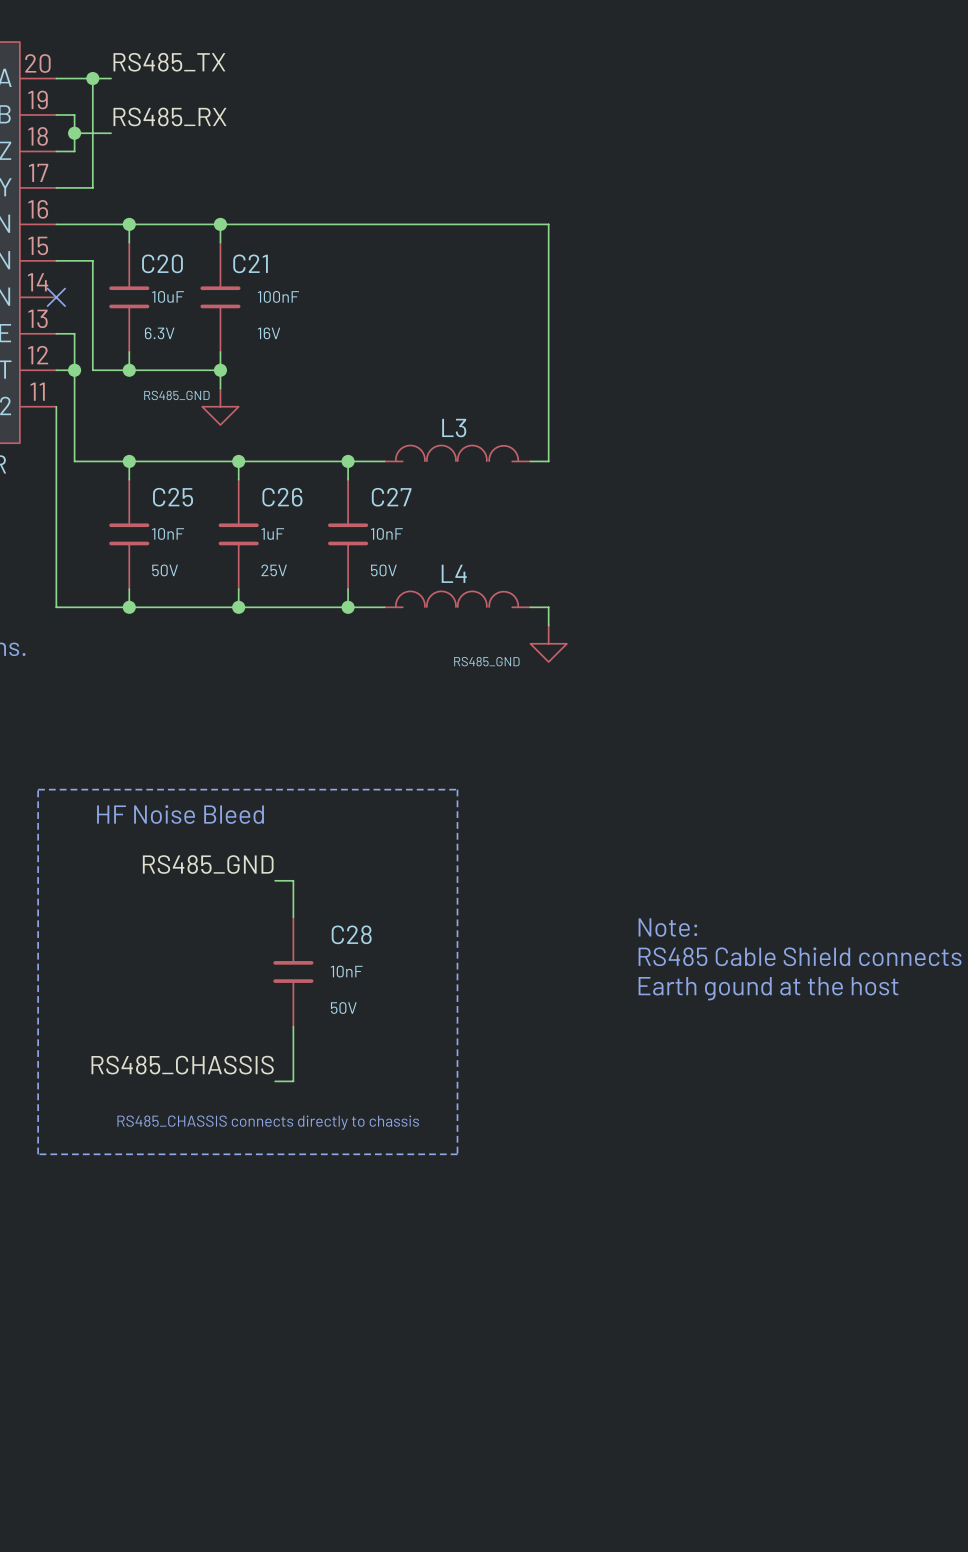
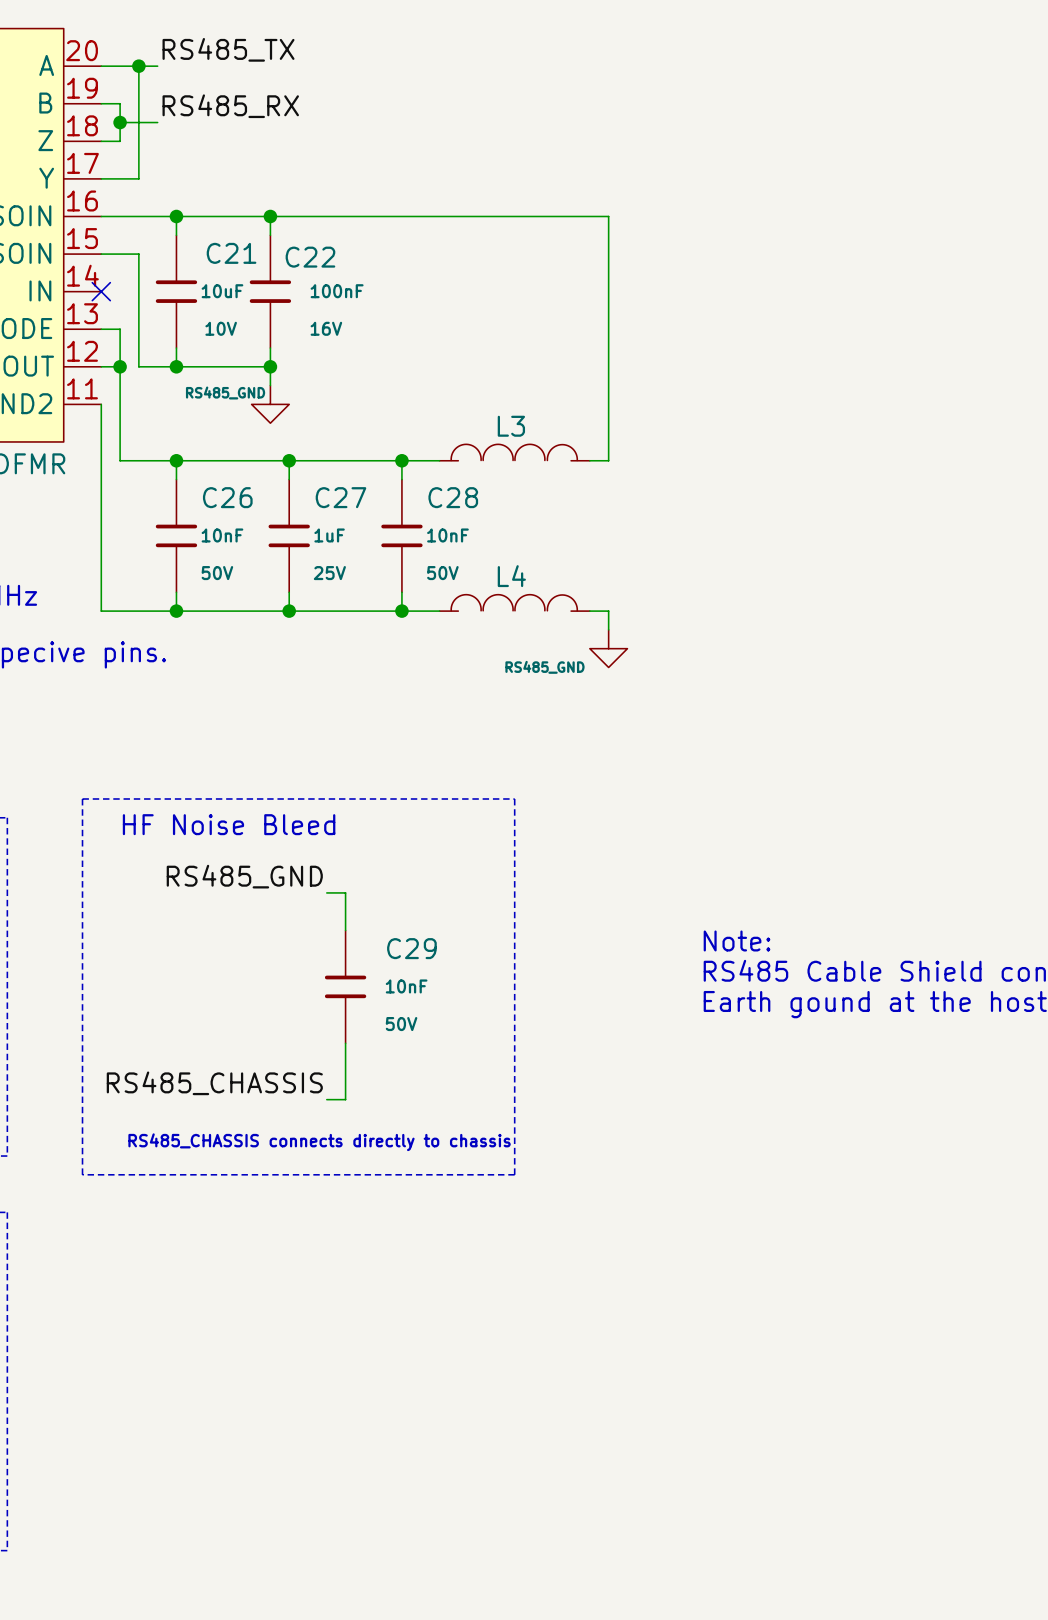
C20 name: C20 (162, 263) -> C21 (231, 253)
C21 name: C21 (250, 263) -> C22 (310, 257)
C20 text: 6.3V (159, 333) -> 10V (221, 328)
C25 name: C25 (173, 497) -> C26 (227, 497)
C26 name: C26 (282, 497) -> C27 (340, 497)
C27 name: C27 (391, 497) -> C28 (453, 497)
C28 name: C28 (351, 934) -> C29 (411, 948)

